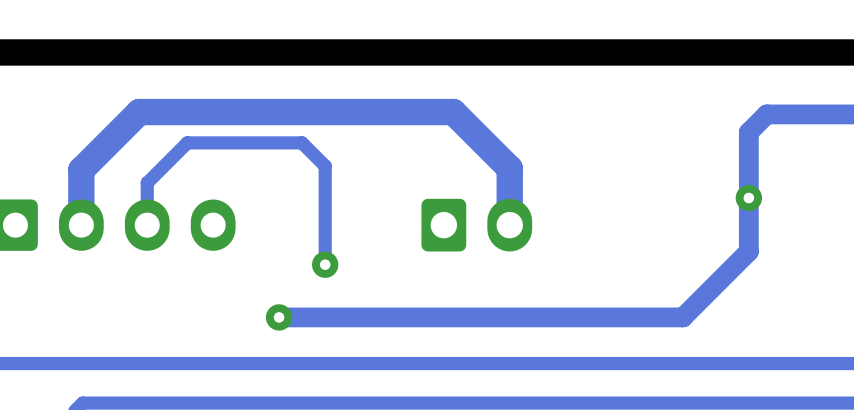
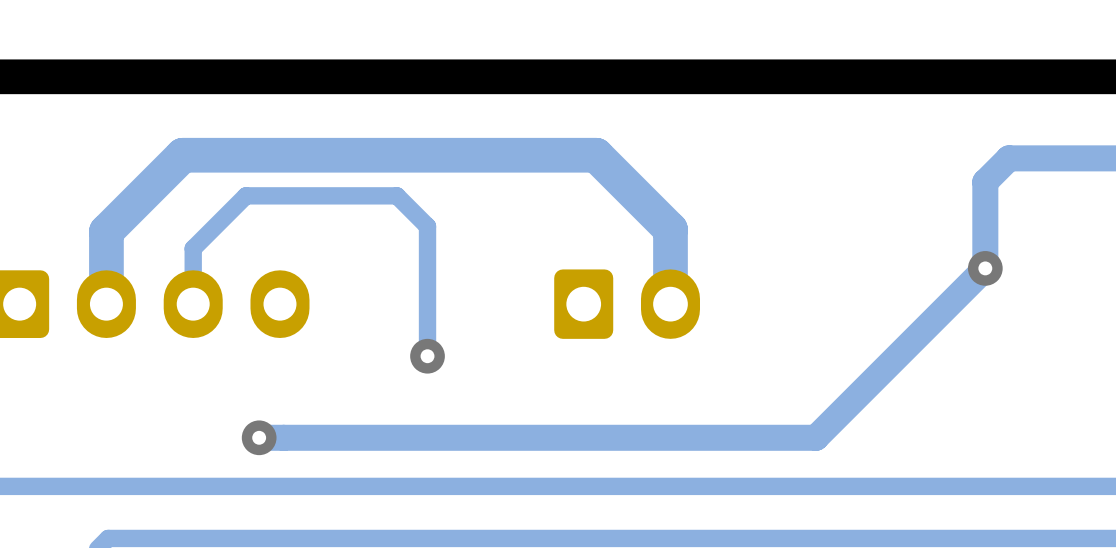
track: (748, 197) (748, 251) (682, 317) (279, 317) -> (985, 268) (815, 437) (259, 437)
via: (279, 317) -> none
via: none -> (259, 437)

